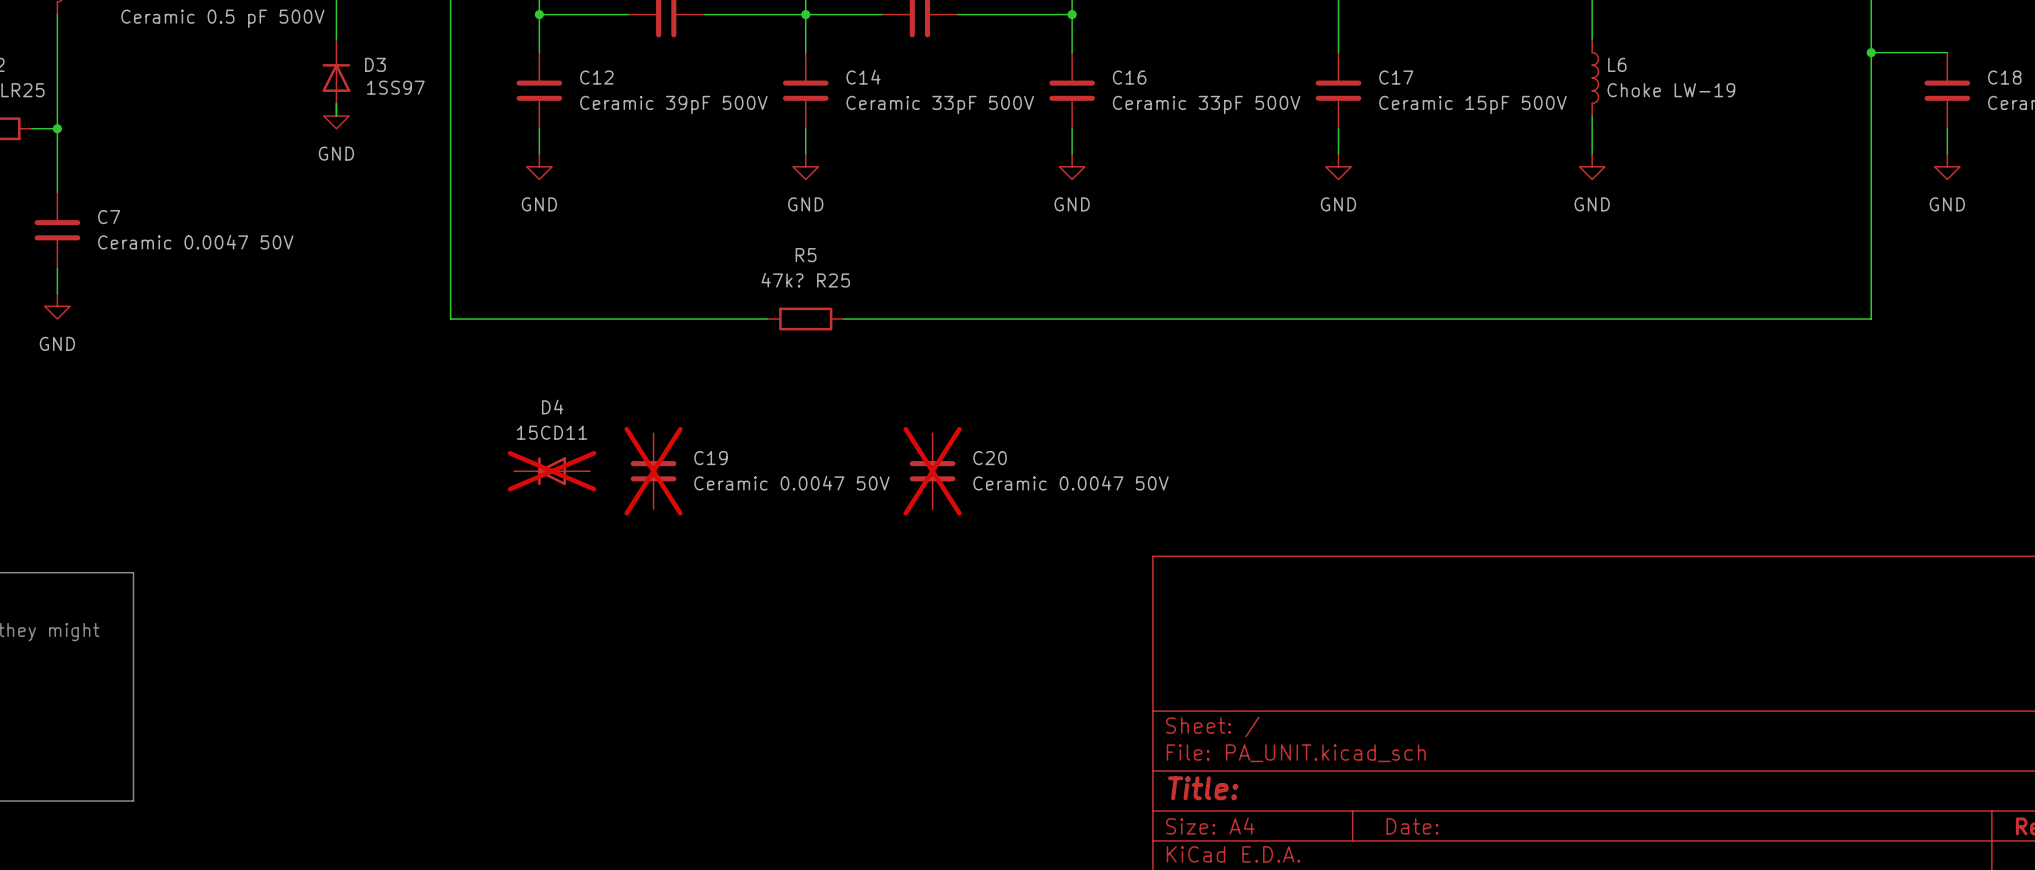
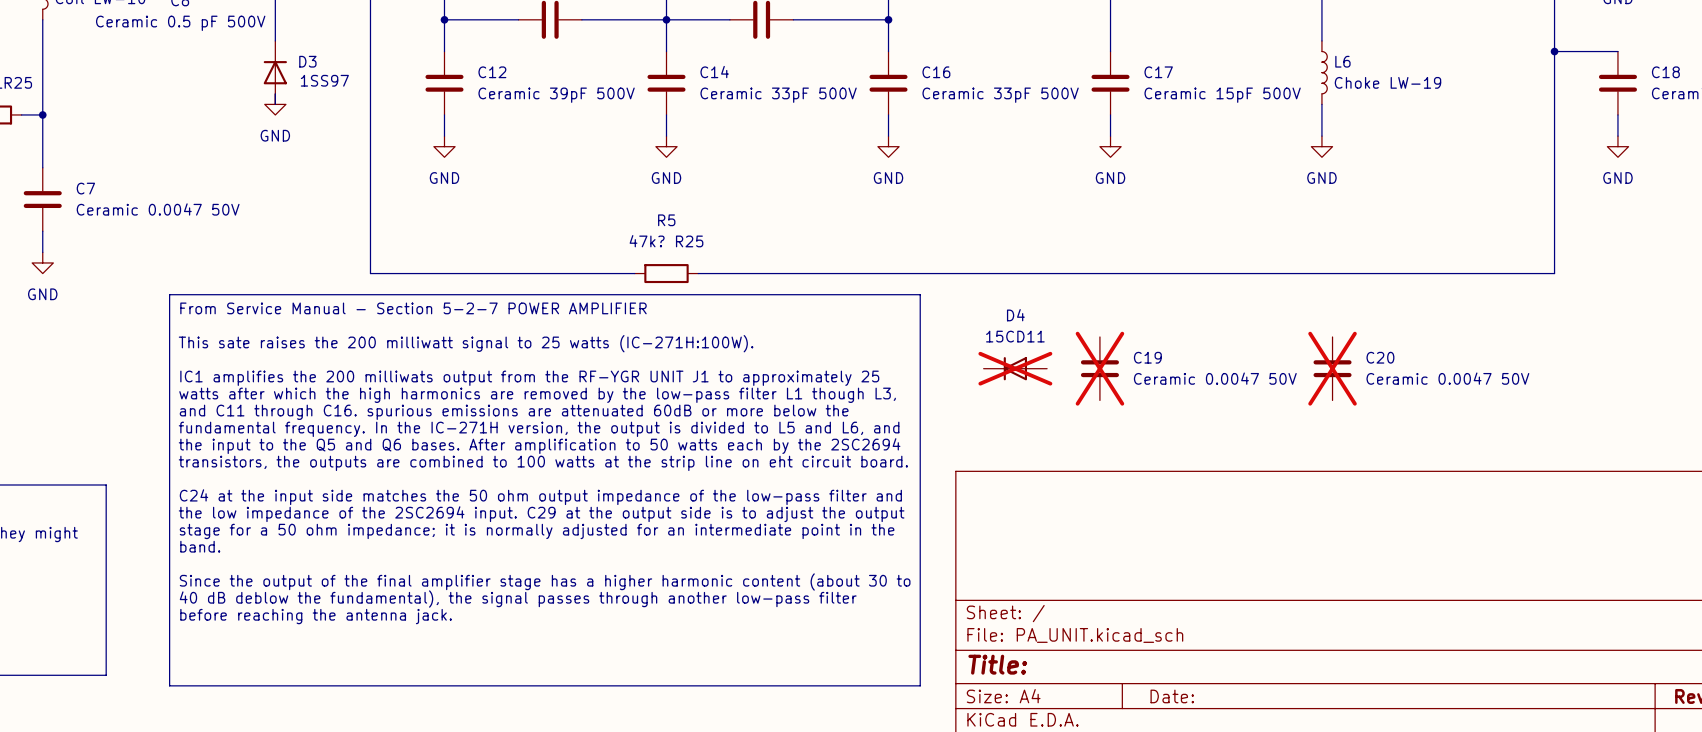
line: none -> (169, 294) (920, 294) (920, 685) (169, 685) (169, 294)
text: none -> From Service Manual - Section 5-2-7 POWER AMPLIFIER (413, 308)
text: none -> This sate raises the 200 milliwatt signal to 25 watts (IC-271H:100W). (466, 343)
text: none -> IC1 amplifies the 200 milliwats output from the RF-YGR UNIT J1 to approximately 25 (529, 378)
text: none -> watts after which the high harmonics are removed by the low-pass filter L1 though L3, (537, 395)
D4 position: (552, 471) -> (1015, 368)
C19 position: (653, 471) -> (1099, 368)
C20 position: (932, 471) -> (1332, 368)
text: none -> and C11 through C16. spurious emissions are attenuated 60dB or more below the (514, 412)
text: none -> fundamental frequency. In the IC-271H version, the output is divided to L5 and L6, and (539, 429)
text: none -> the input to the Q5 and Q6 bases. After amplification to 50 watts each by the 2SC2694 (539, 446)
text: none -> transistors, the outputs are combined to 100 watts at the strip line on eht circuit board. (543, 463)
text: none -> C24 at the input side matches the 50 ohm output impedance of the low-pass filter and (540, 497)
text: none -> the low impedance of the 2SC2694 input. C29 at the output side is to adjust the output (541, 514)
text: none -> stage for a 50 ohm impedance; it is normally adjusted for an intermediate point in the (537, 531)
text: none -> band. (200, 546)
text: none -> Since the output of the final amplifier stage has a higher harmonic content (about 30 to (545, 582)
text: none -> 40 dB deblow the fundamental), the signal passes through another low-pass filter (518, 599)
text: none -> before reaching the antenna jack. (316, 616)

